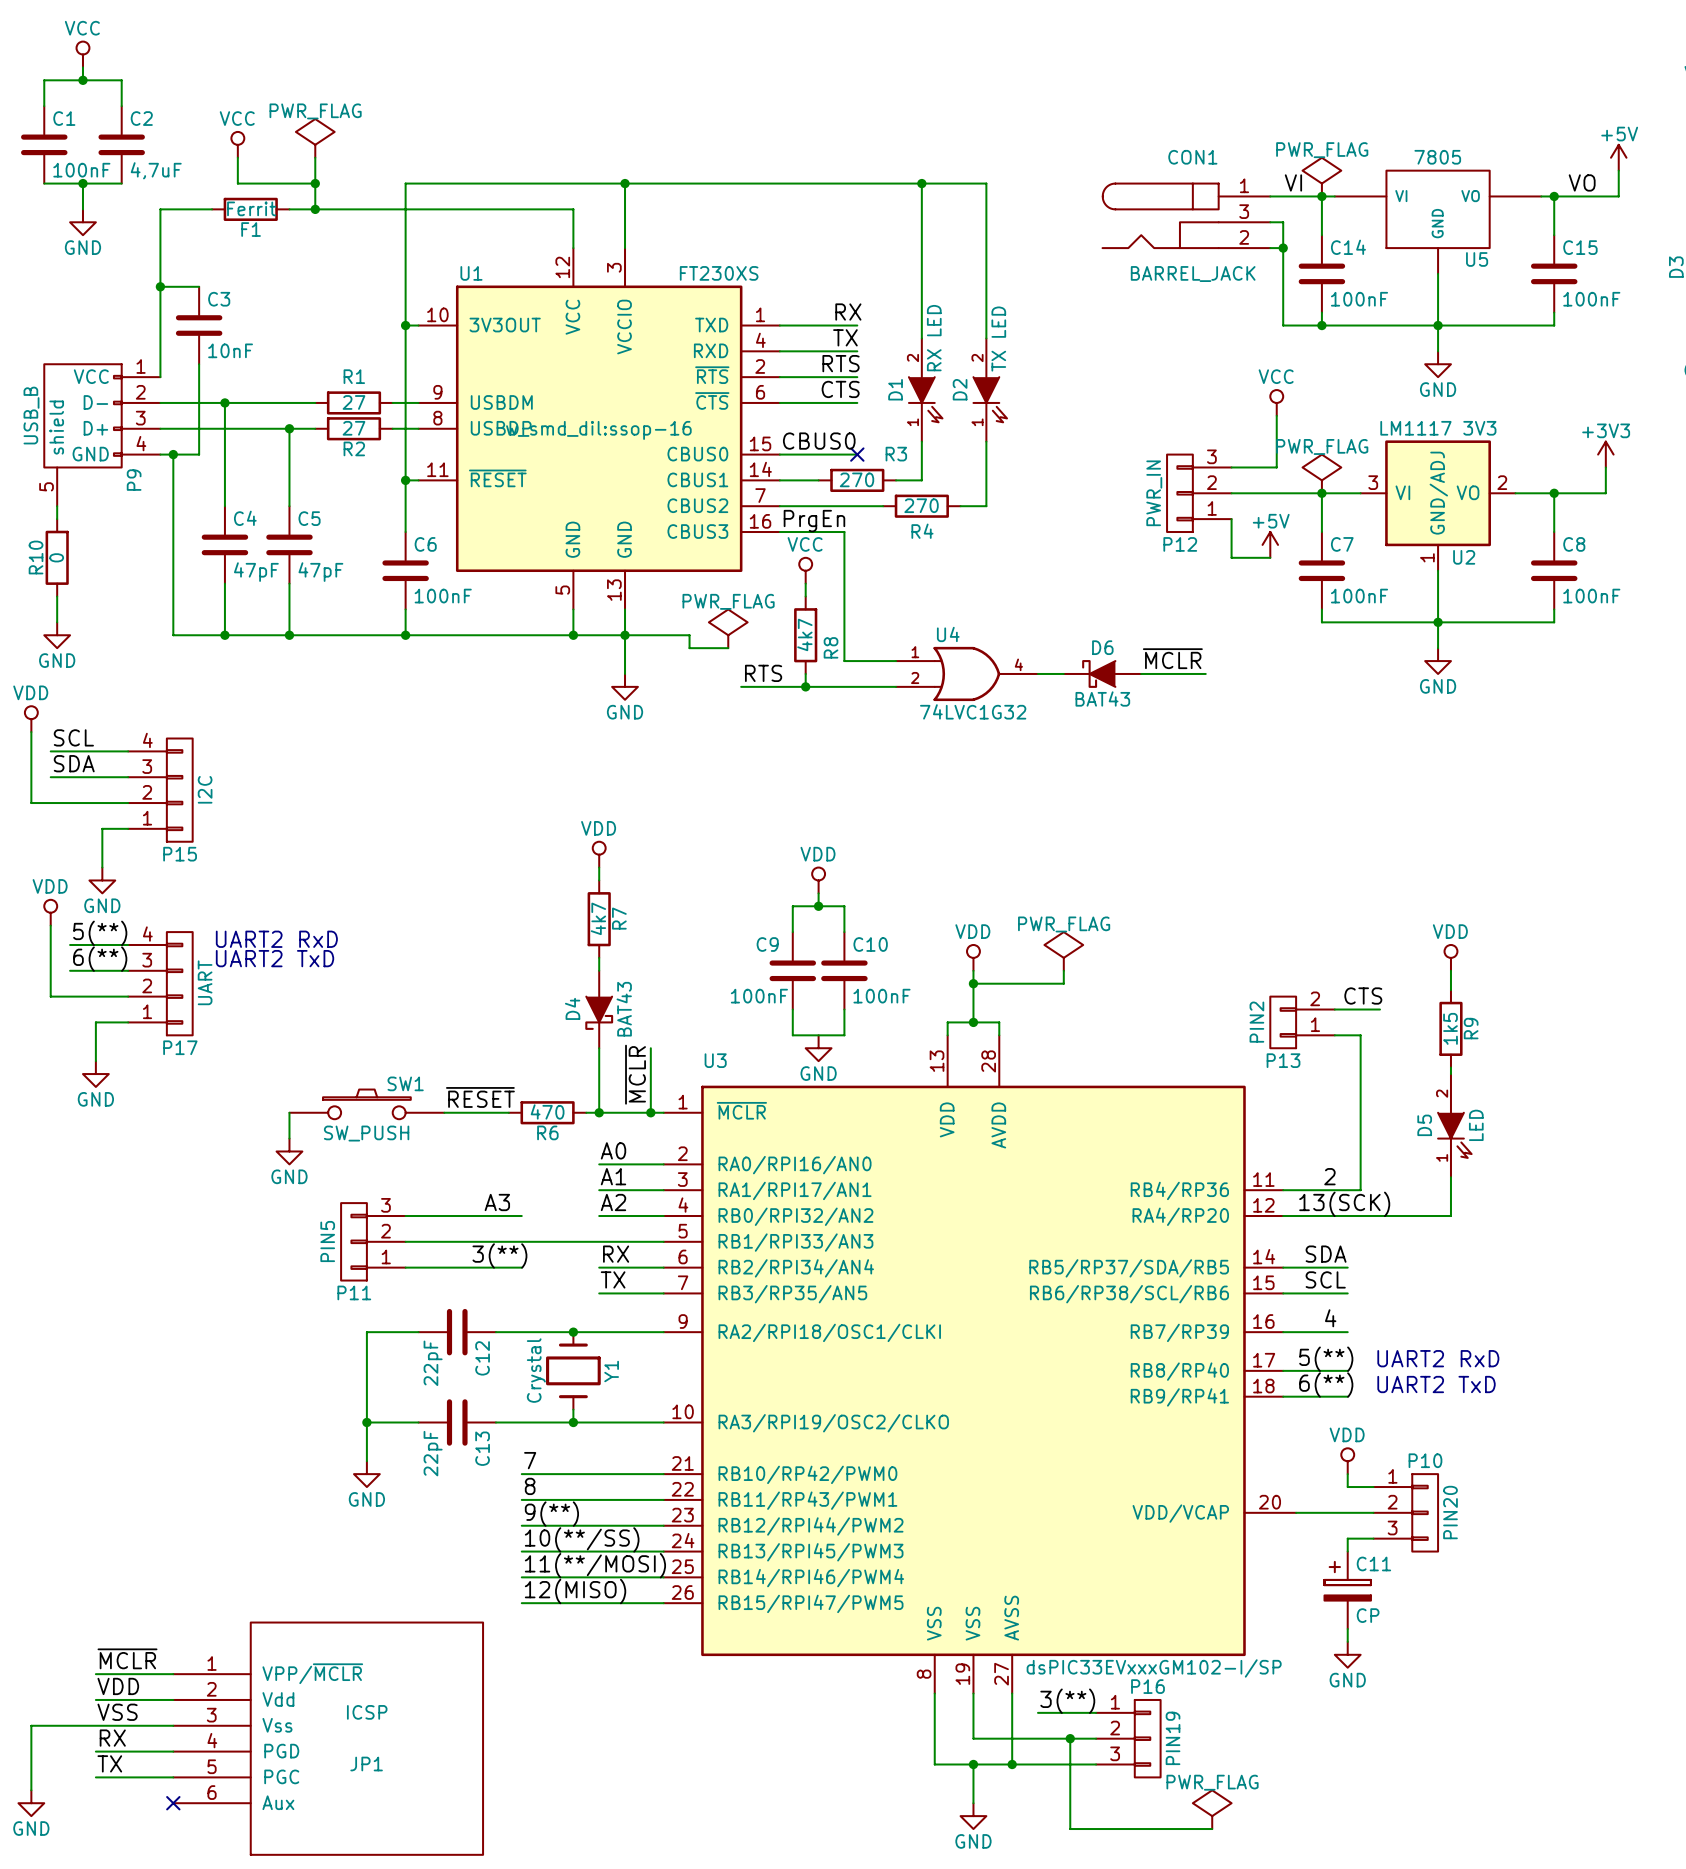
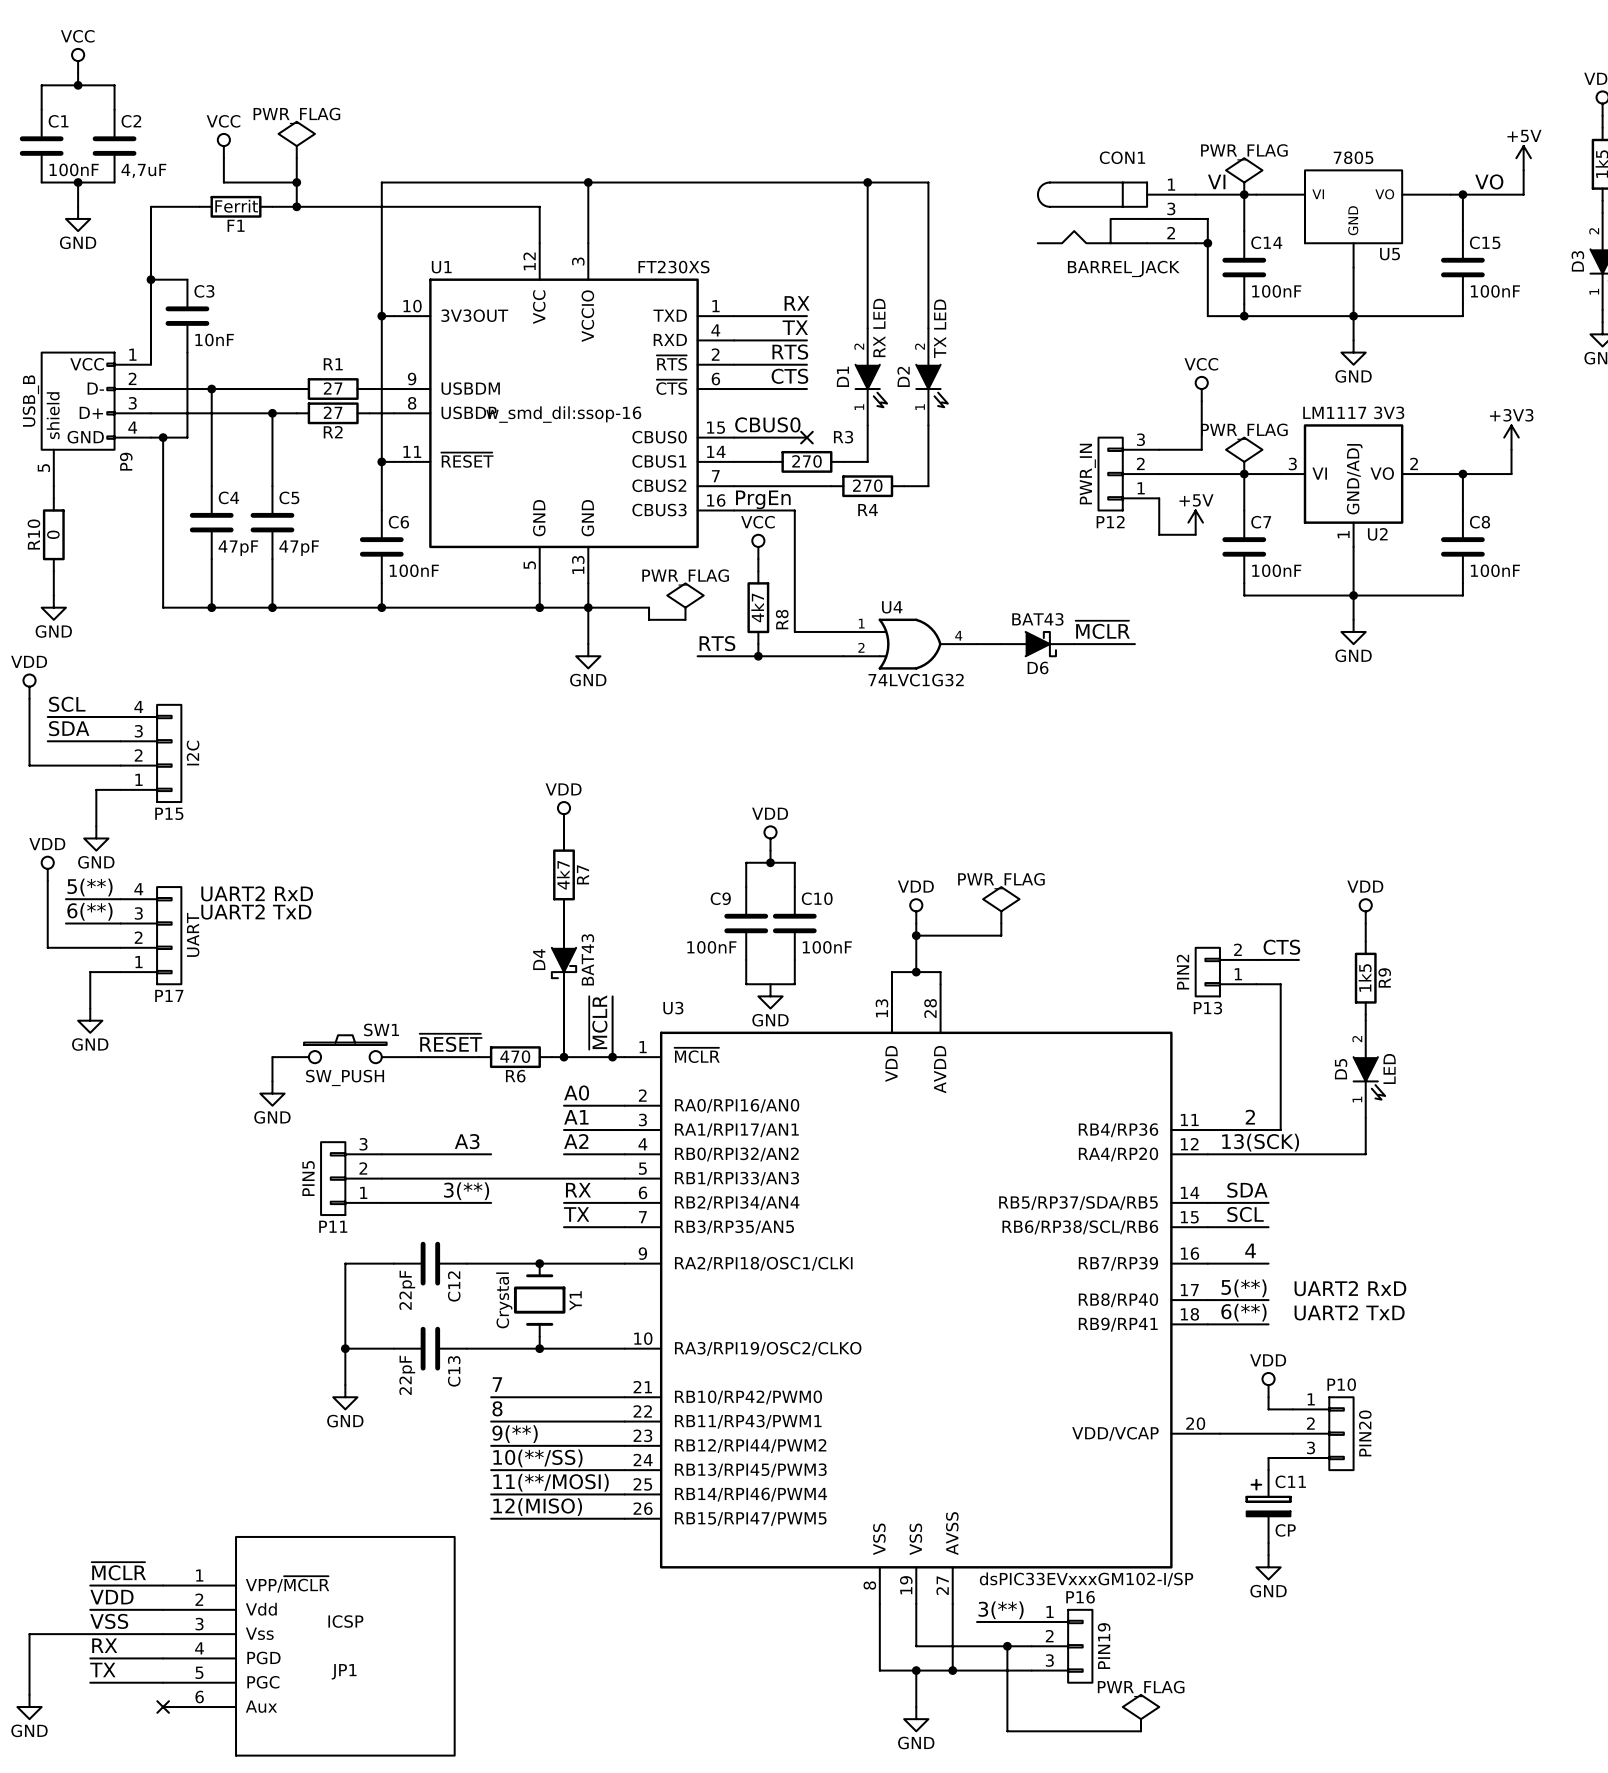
D6 rotation: 0° (1098, 673) -> 180° (1041, 644)

